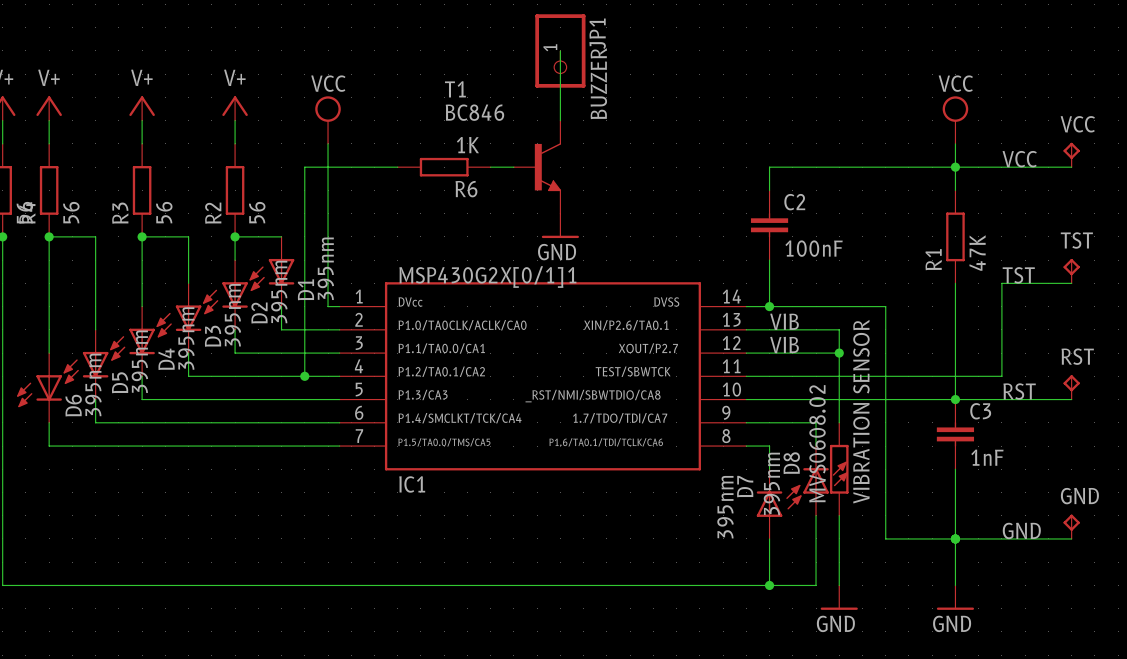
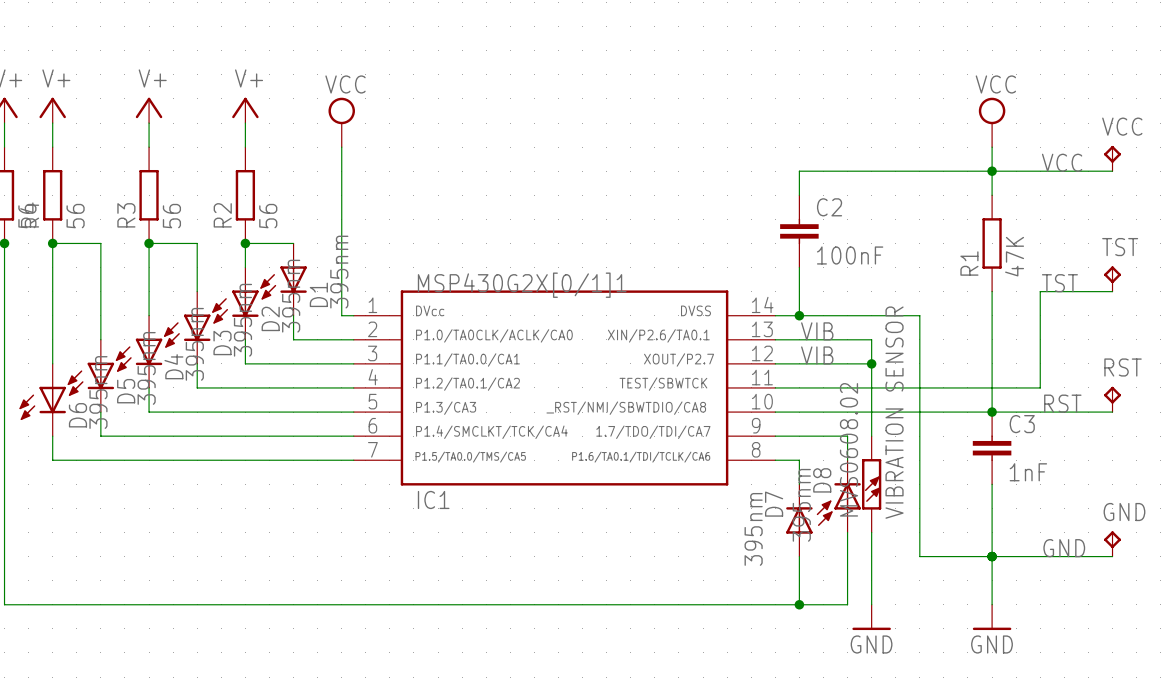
wire: (560, 50) (560, 120) -> none
JP1: (560, 50) -> none
label: BUZZER (598, 83) -> none
wire: (397, 167) (304, 167) (304, 376) -> none
R6: 1K (444, 167) -> none
wire: (490, 167) (513, 167) -> none
T1: BC846 (537, 167) -> none
power symbol: GND (560, 225) -> none
junction: (304, 376) -> none

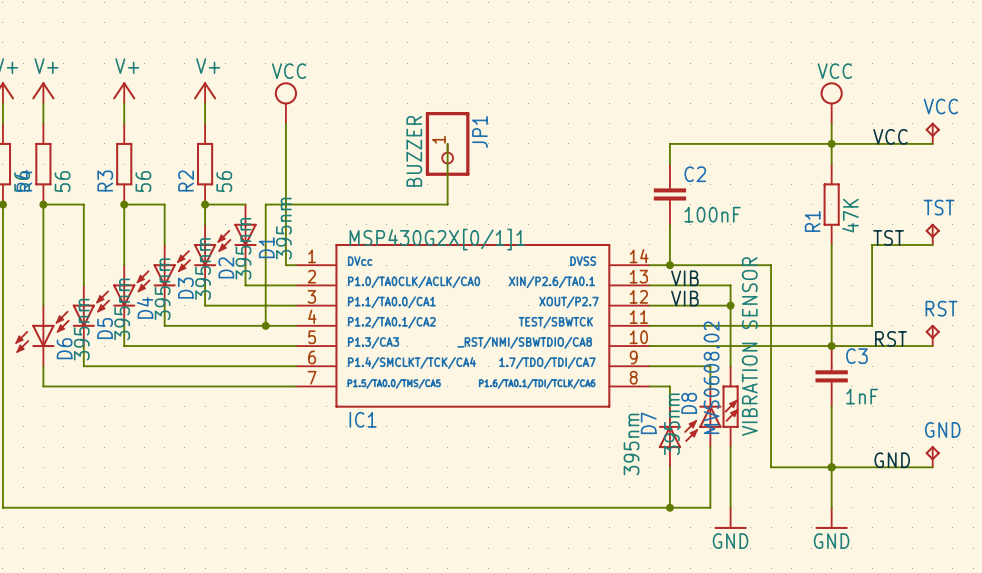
wire: none -> (447, 143) (447, 204) (265, 204) (265, 325)
JP1: none -> BUZZER (447, 143)
junction: none -> (265, 325)

